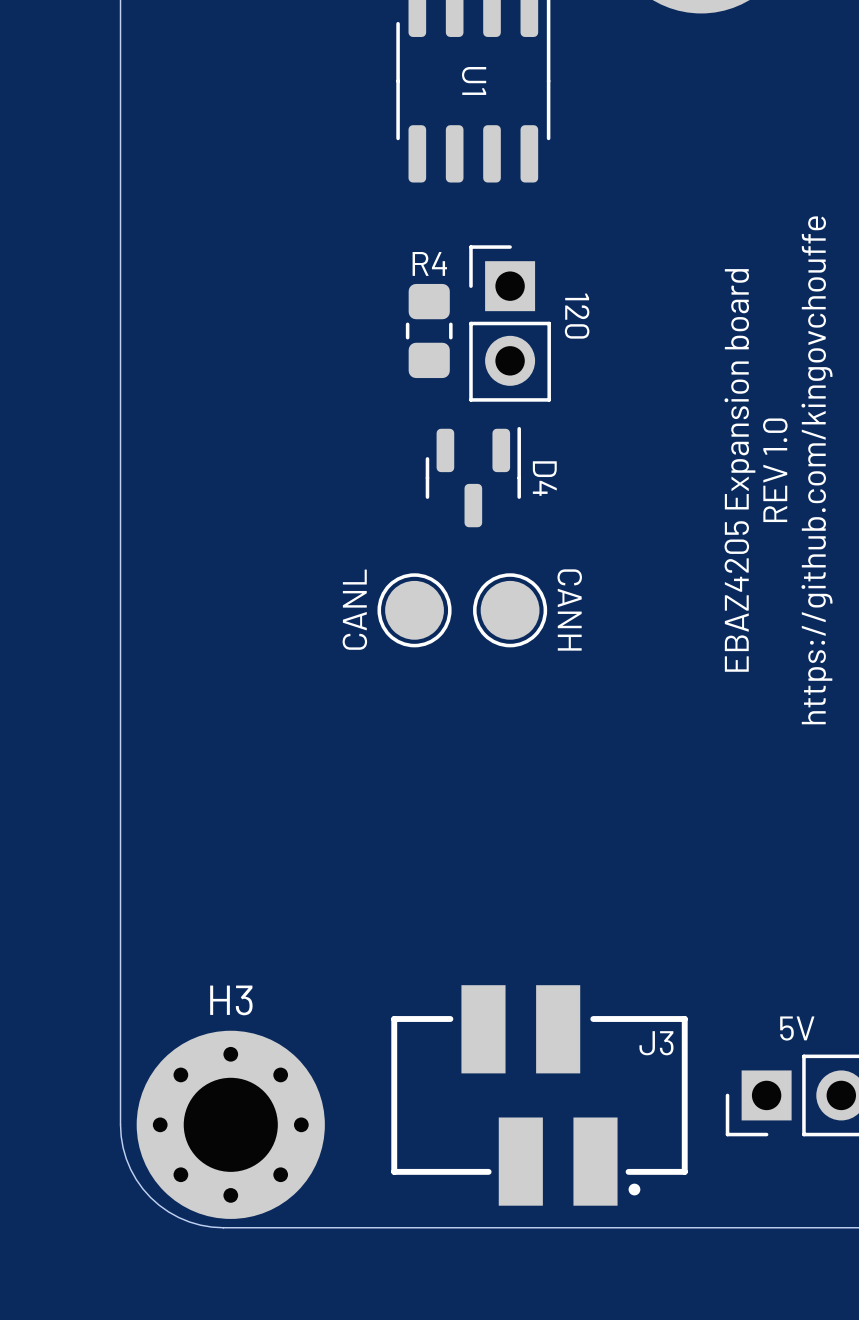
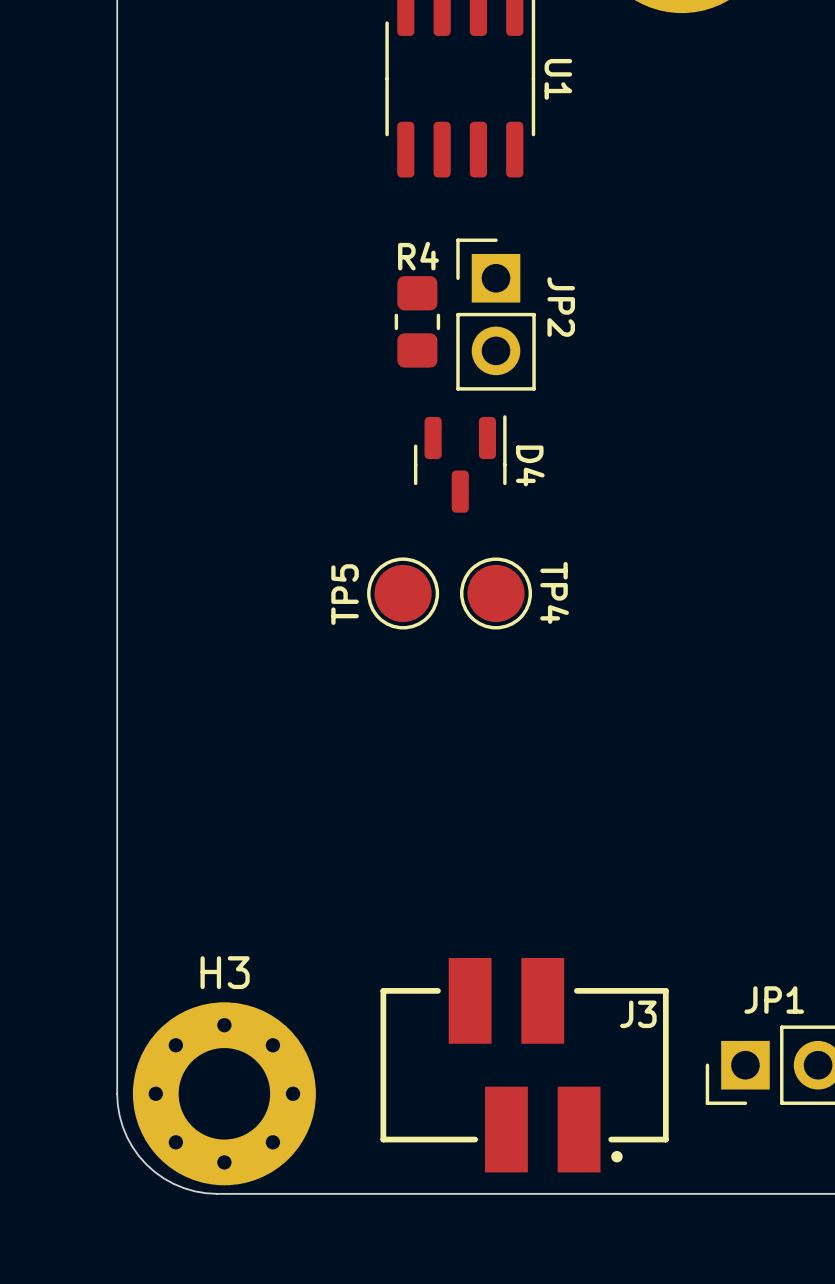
U1 name position: U1 (474, 80) -> U1 (558, 79)
120 name: 120 (577, 316) -> JP2 (561, 307)
text: EBAZ4205 Expansion board (739, 470) -> none
text: REV 1.0 (775, 470) -> none
text: https://github.com/kingovchouffe (816, 470) -> none
CANL name: CANL (354, 609) -> TP5 (345, 594)
CANH name: CANH (569, 609) -> TP4 (554, 592)
5V name: 5V (797, 1028) -> JP1 (774, 1000)

